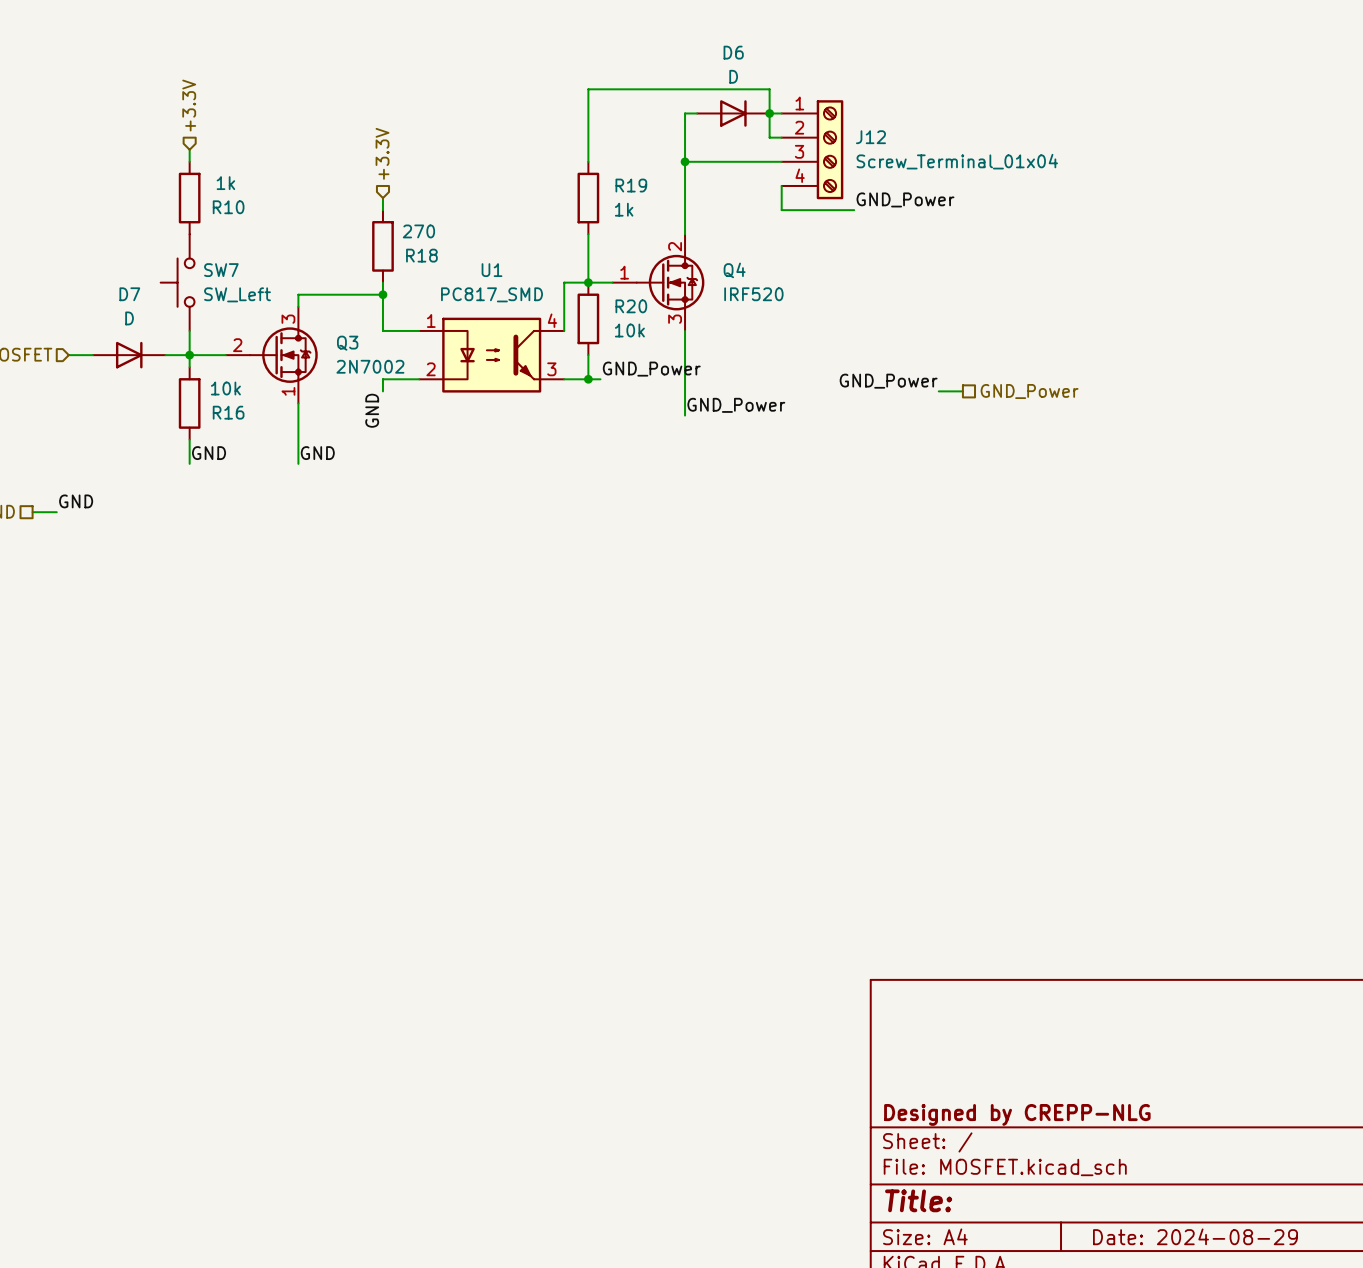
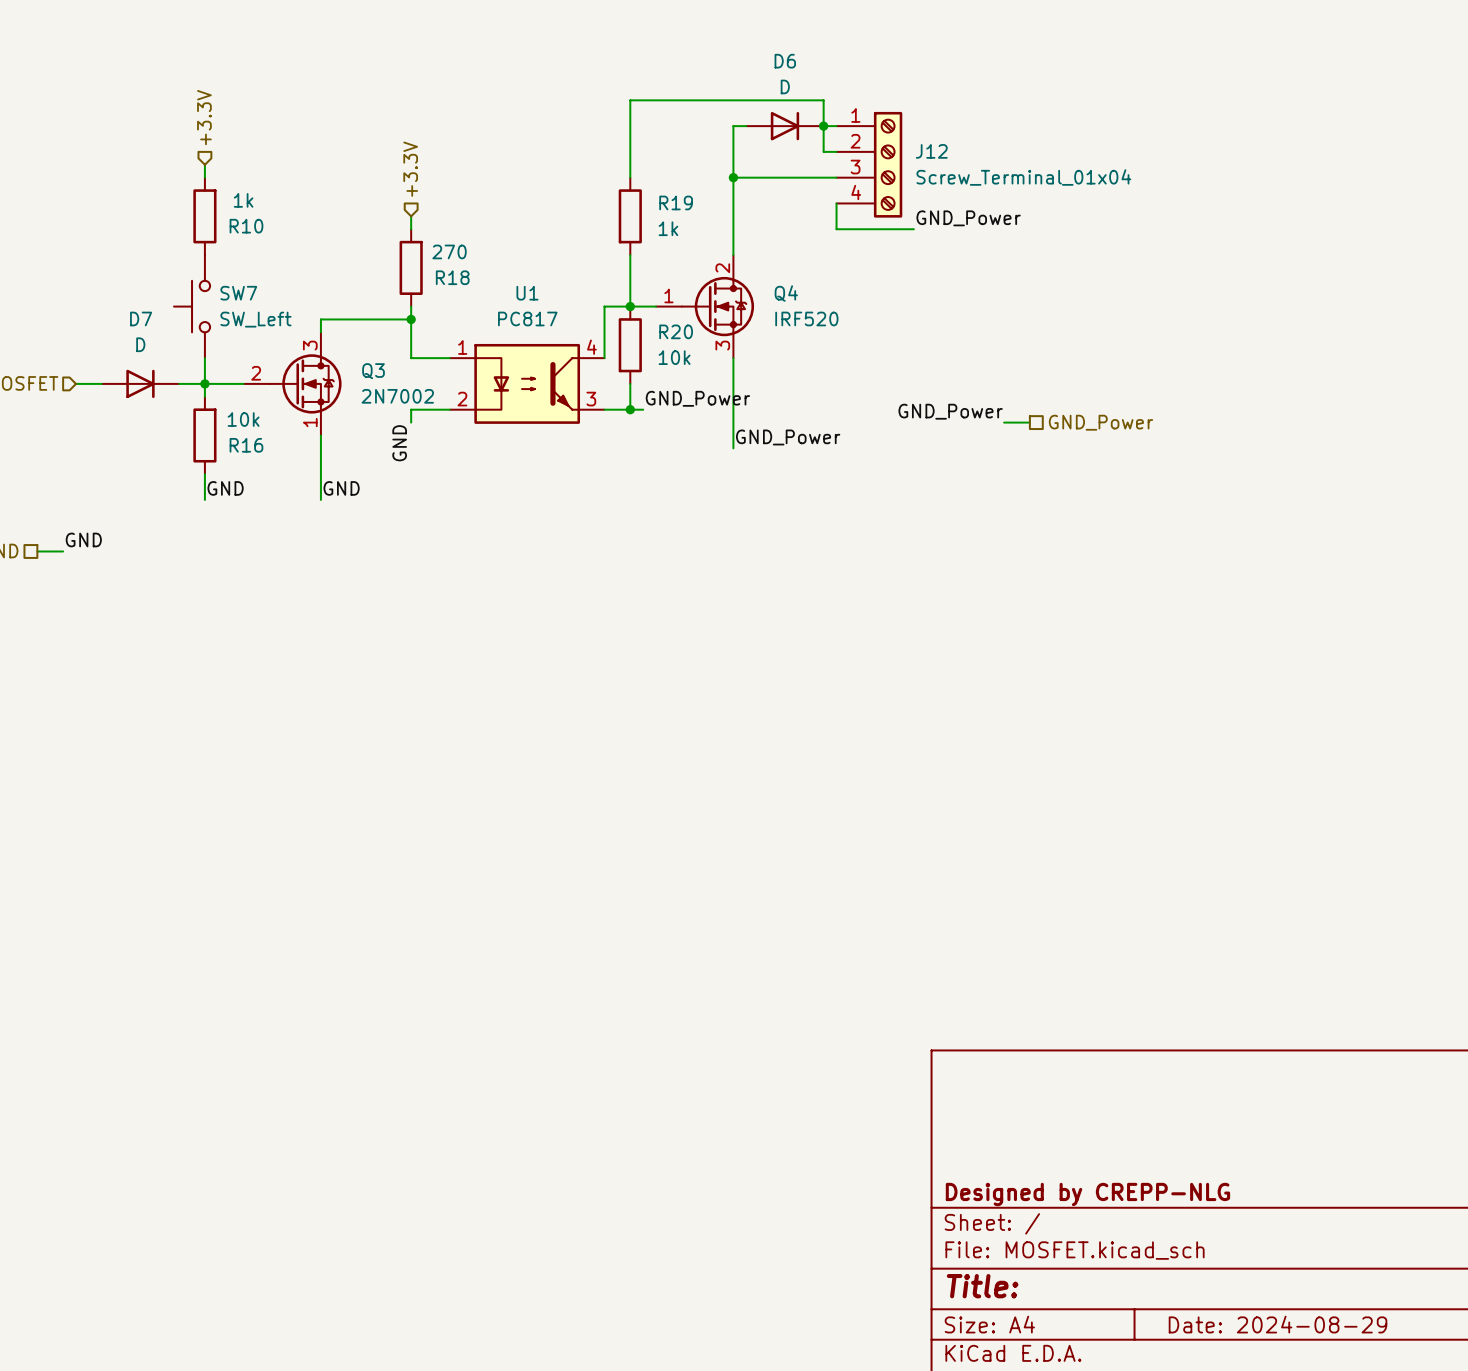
U1 value: PC817_SMD (492, 294) -> PC817 (527, 318)

